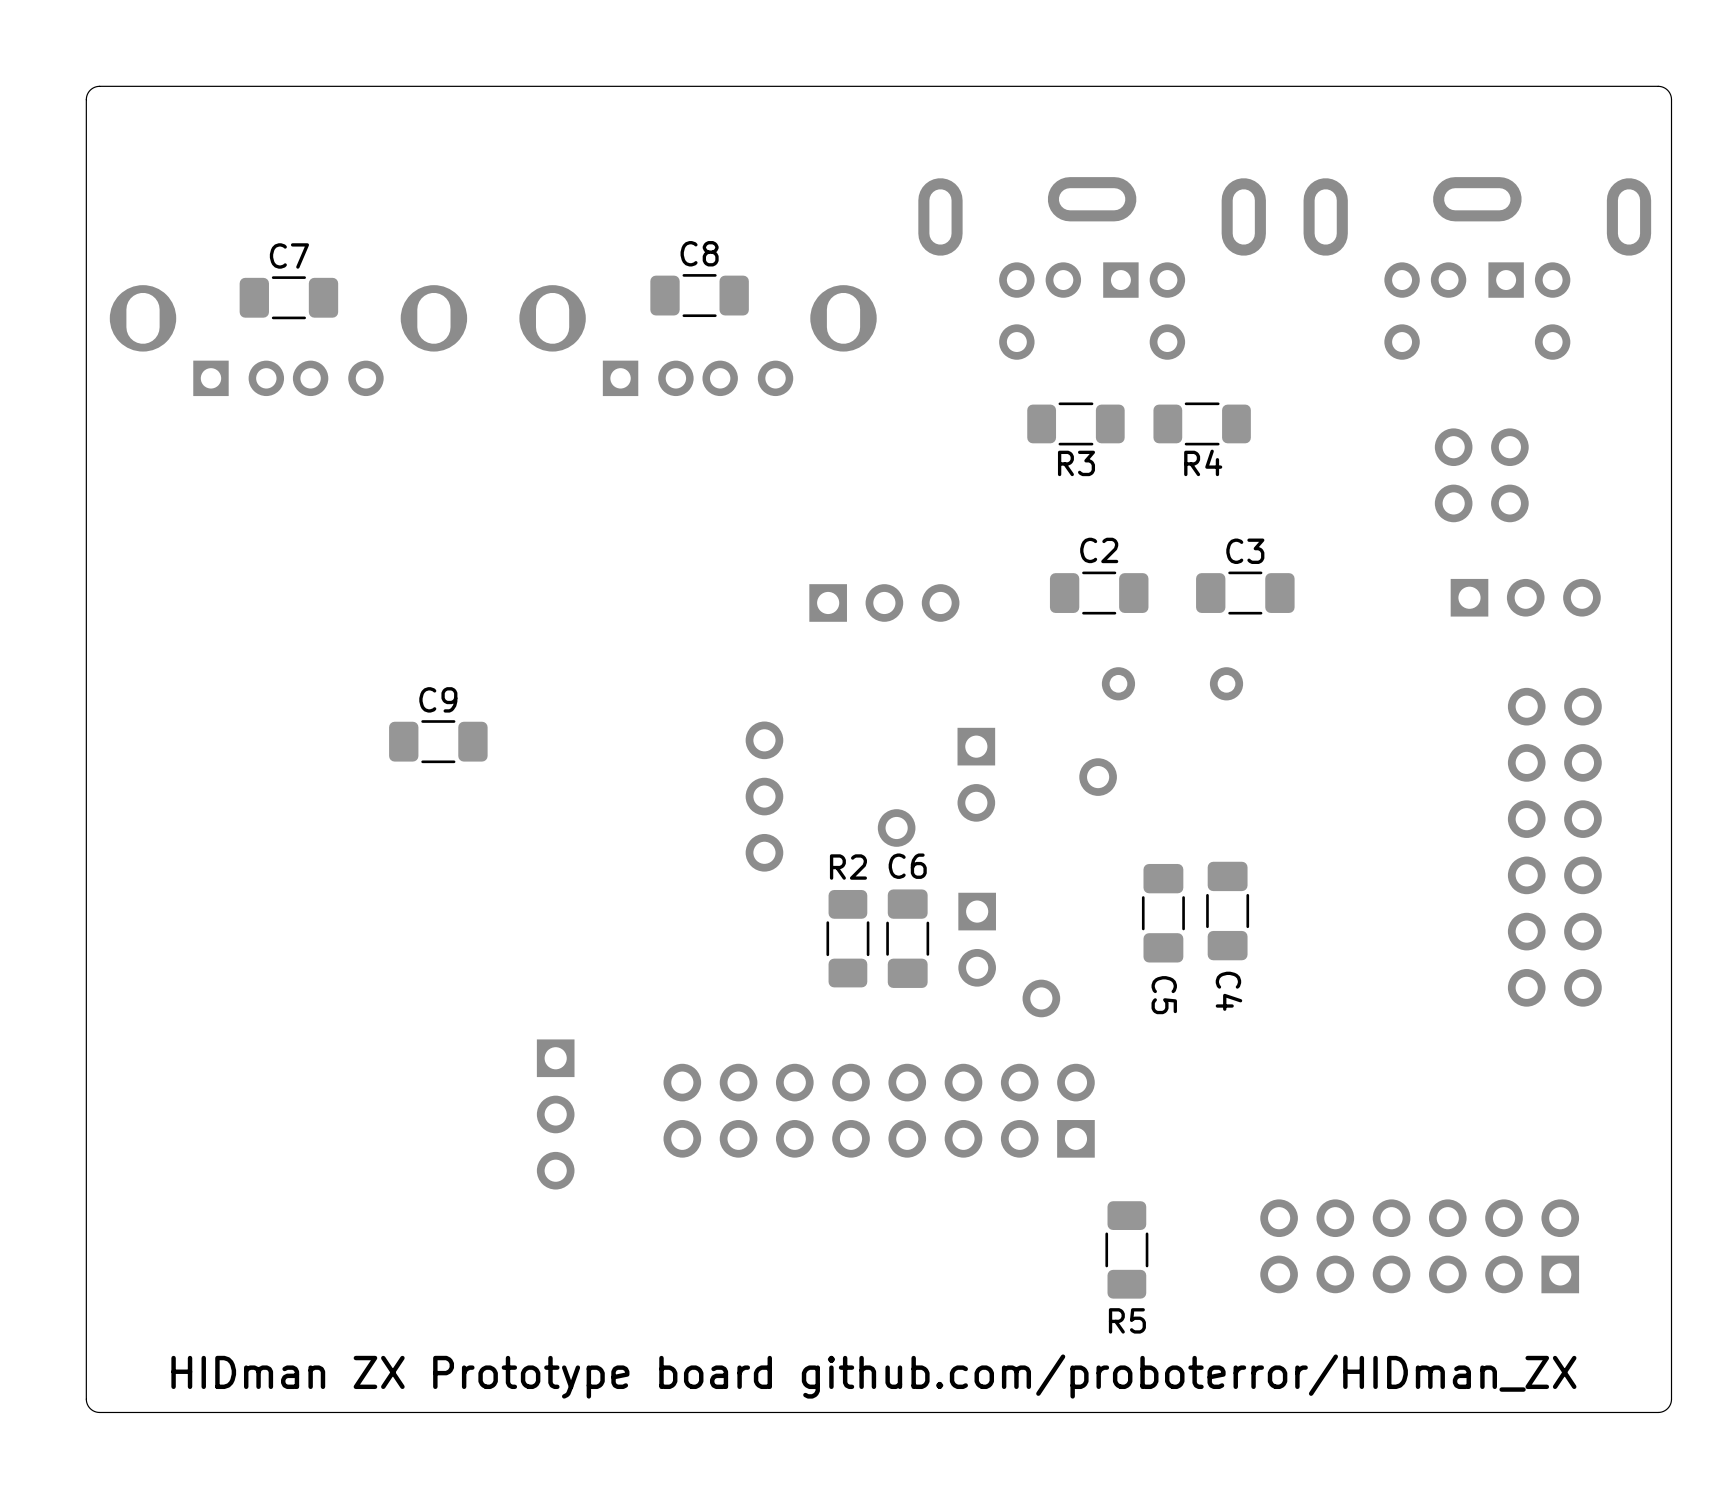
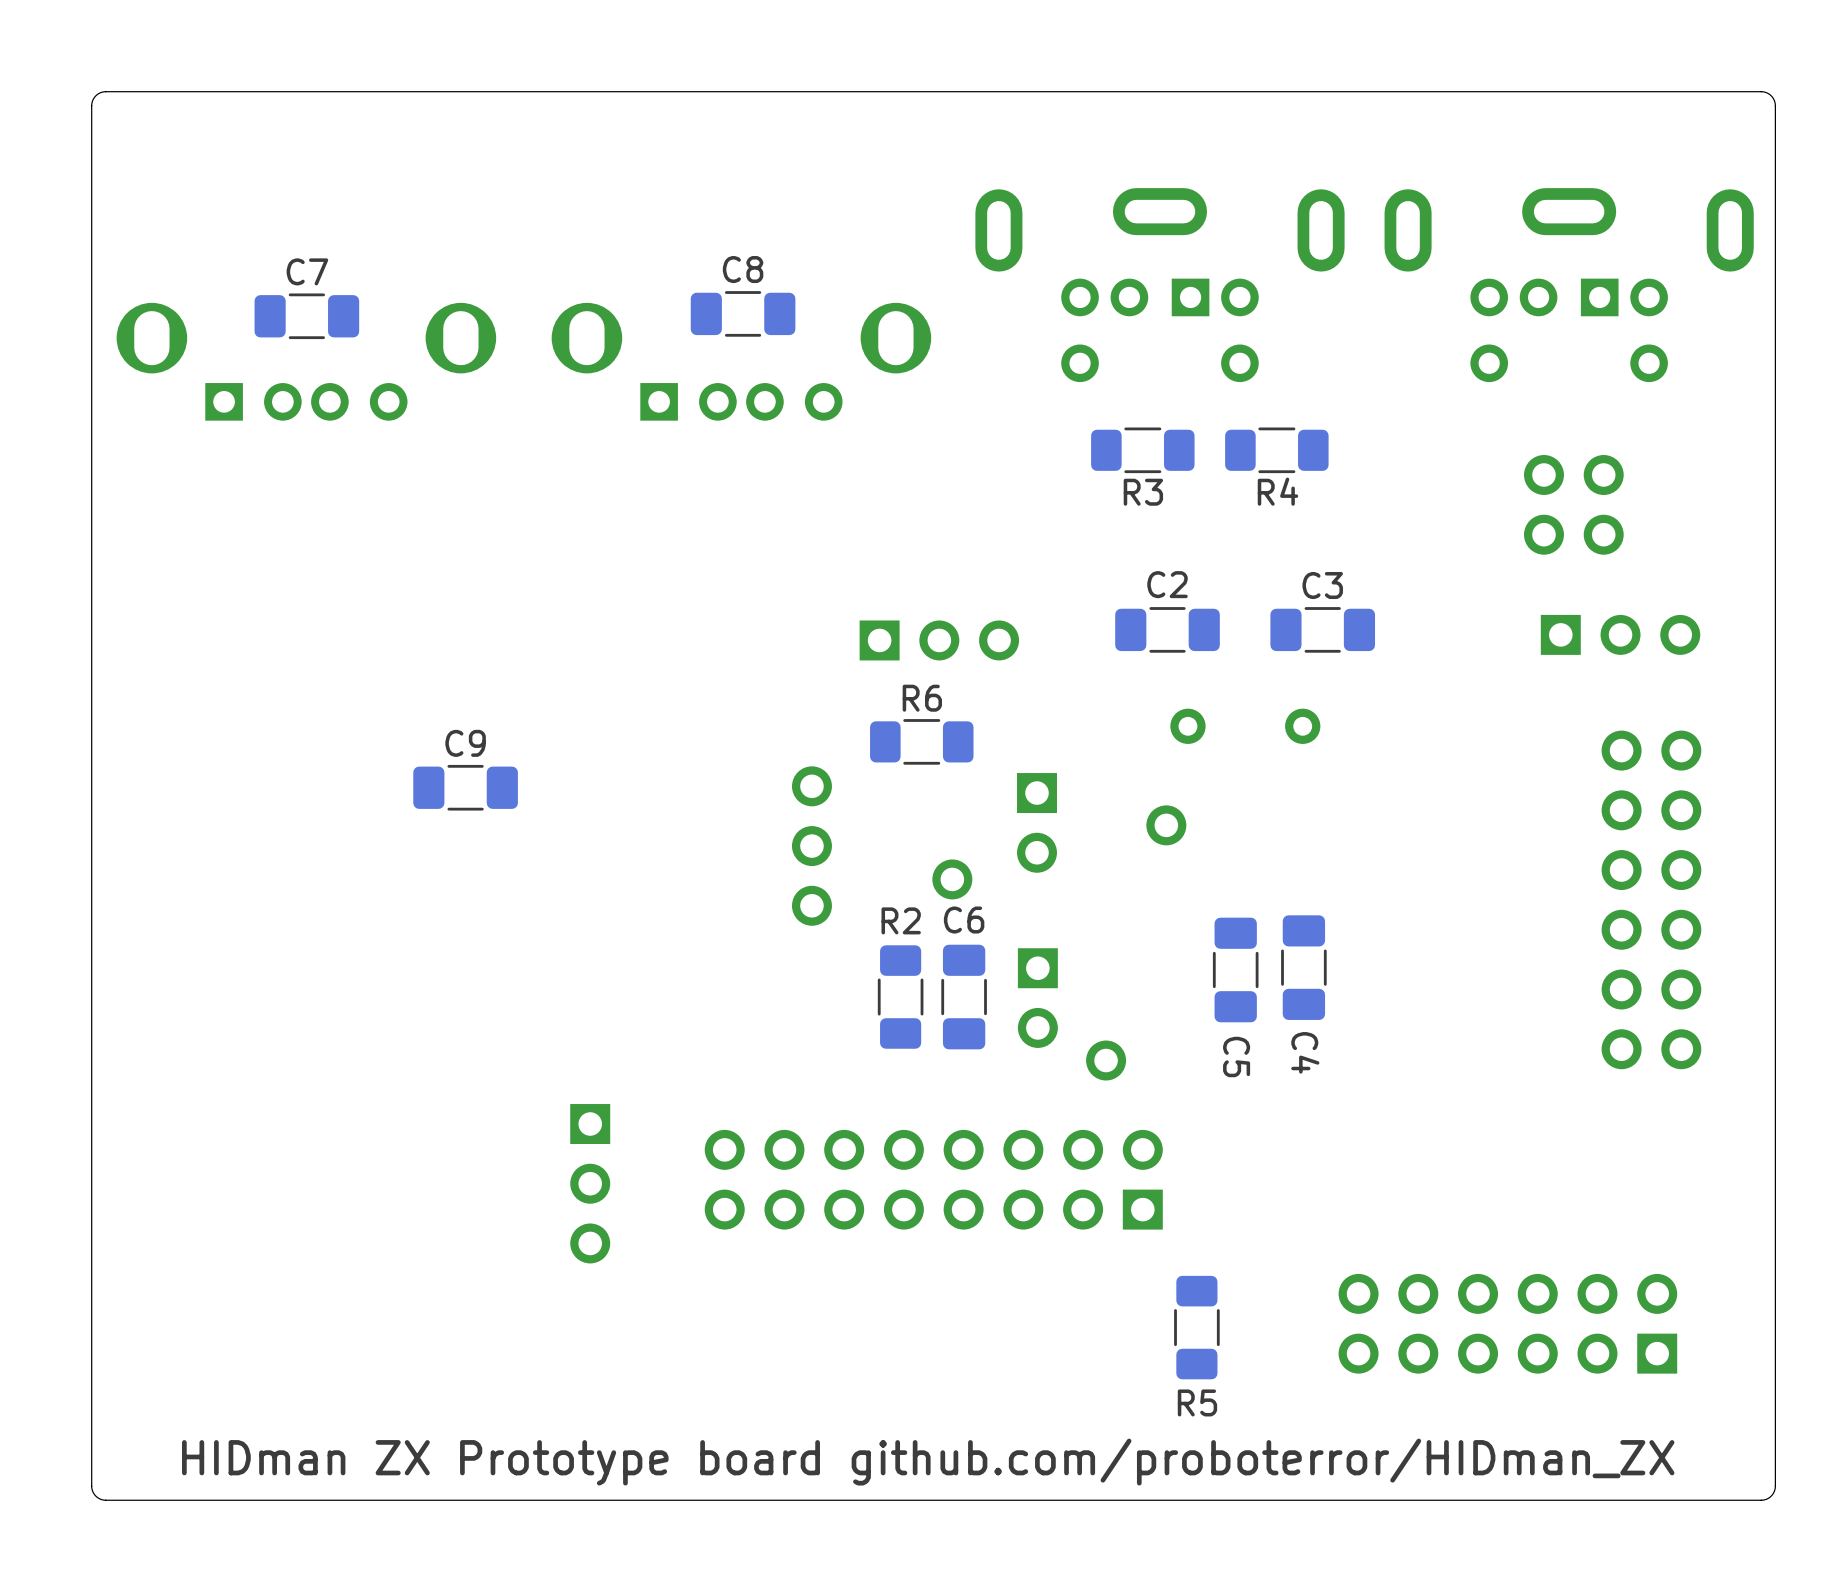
R6: none -> (921, 741)

